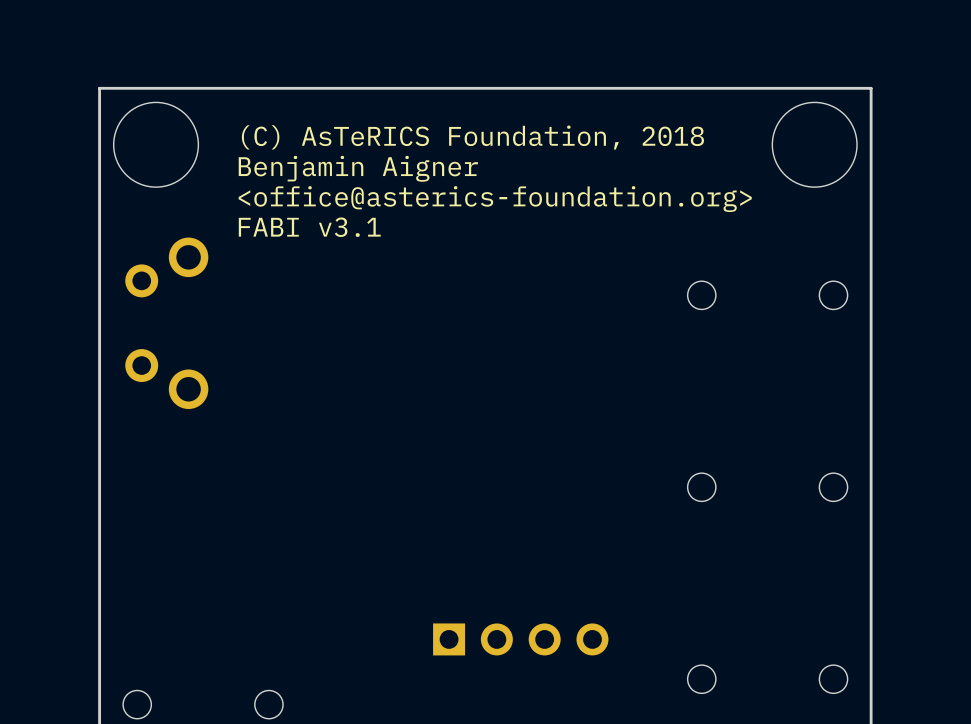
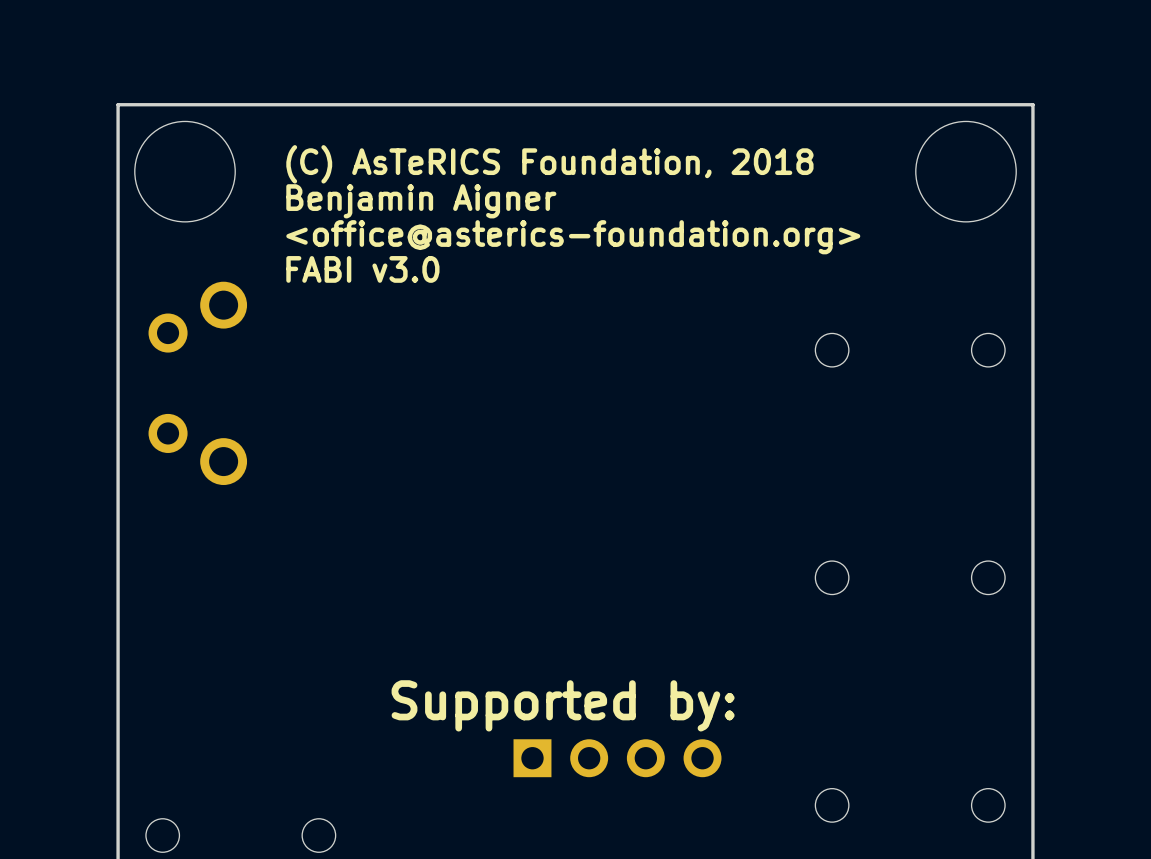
text: FABI v3.1 (309, 227) -> FABI v3.0 (362, 269)
text: none -> Supported by: (563, 705)

